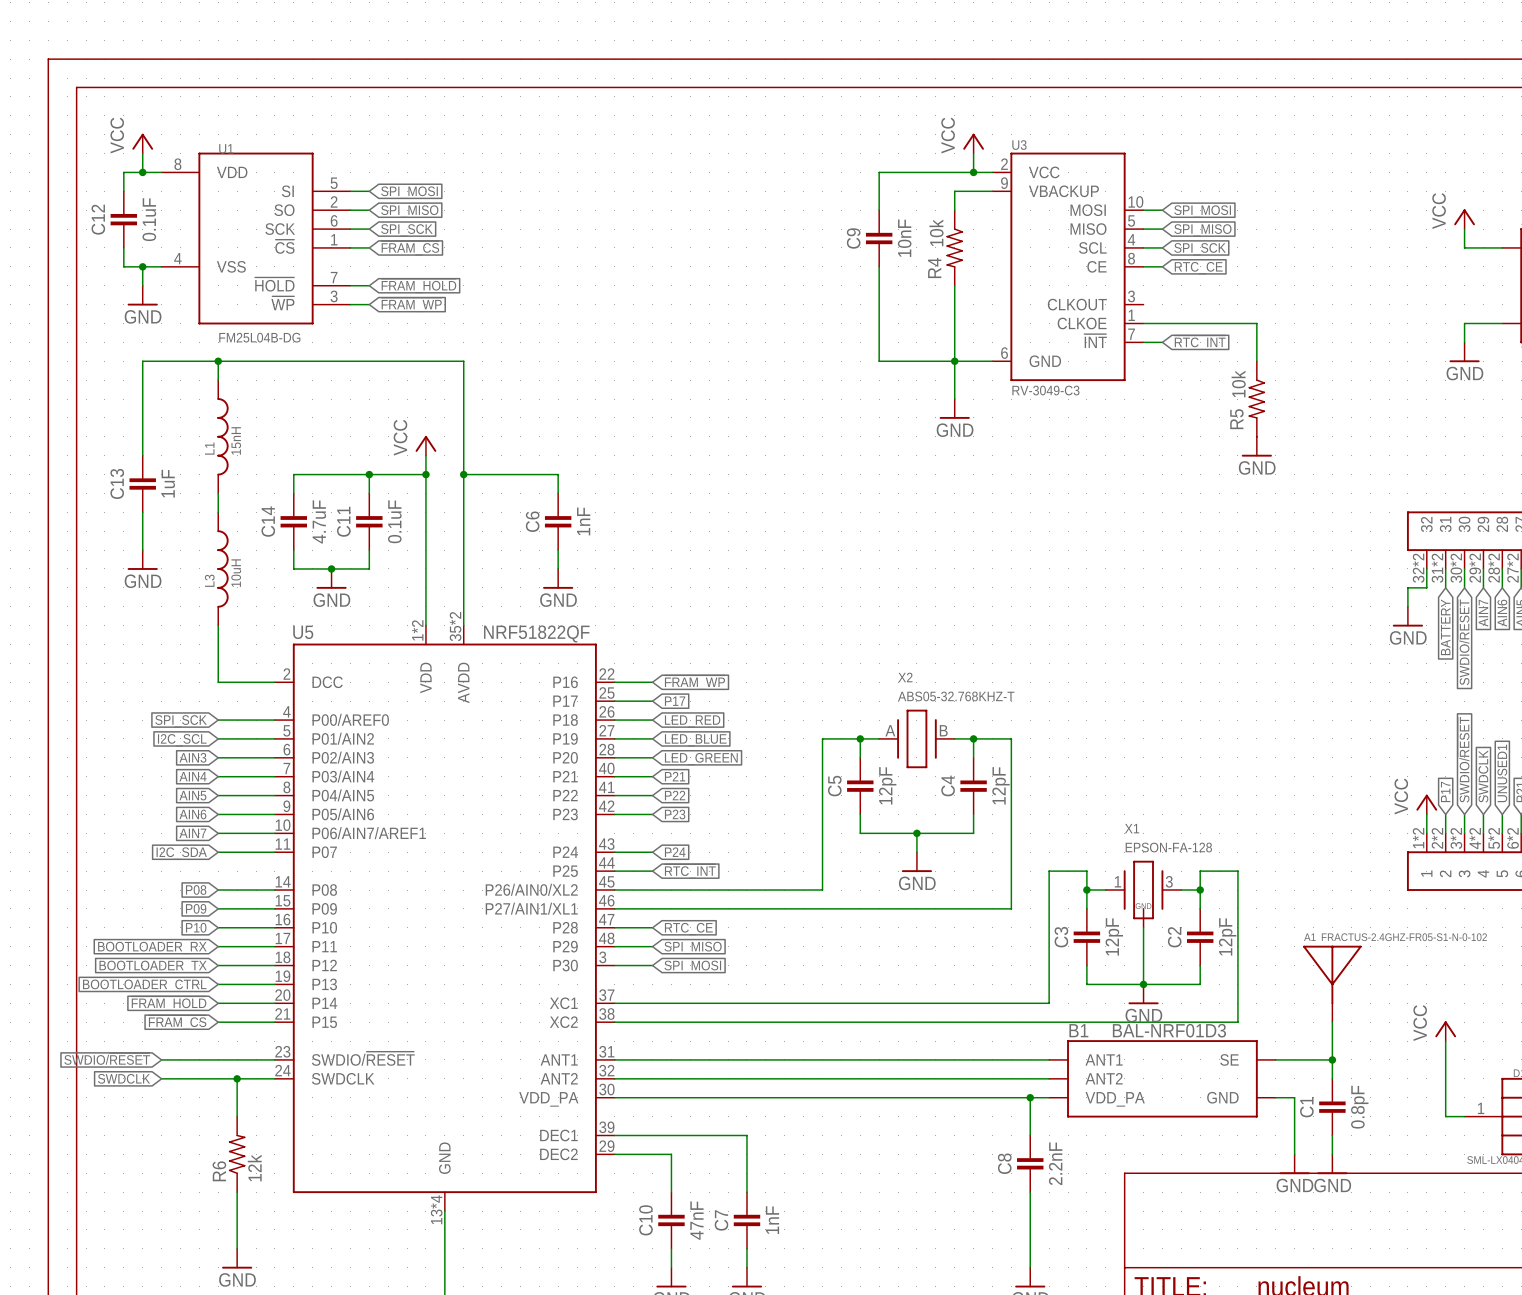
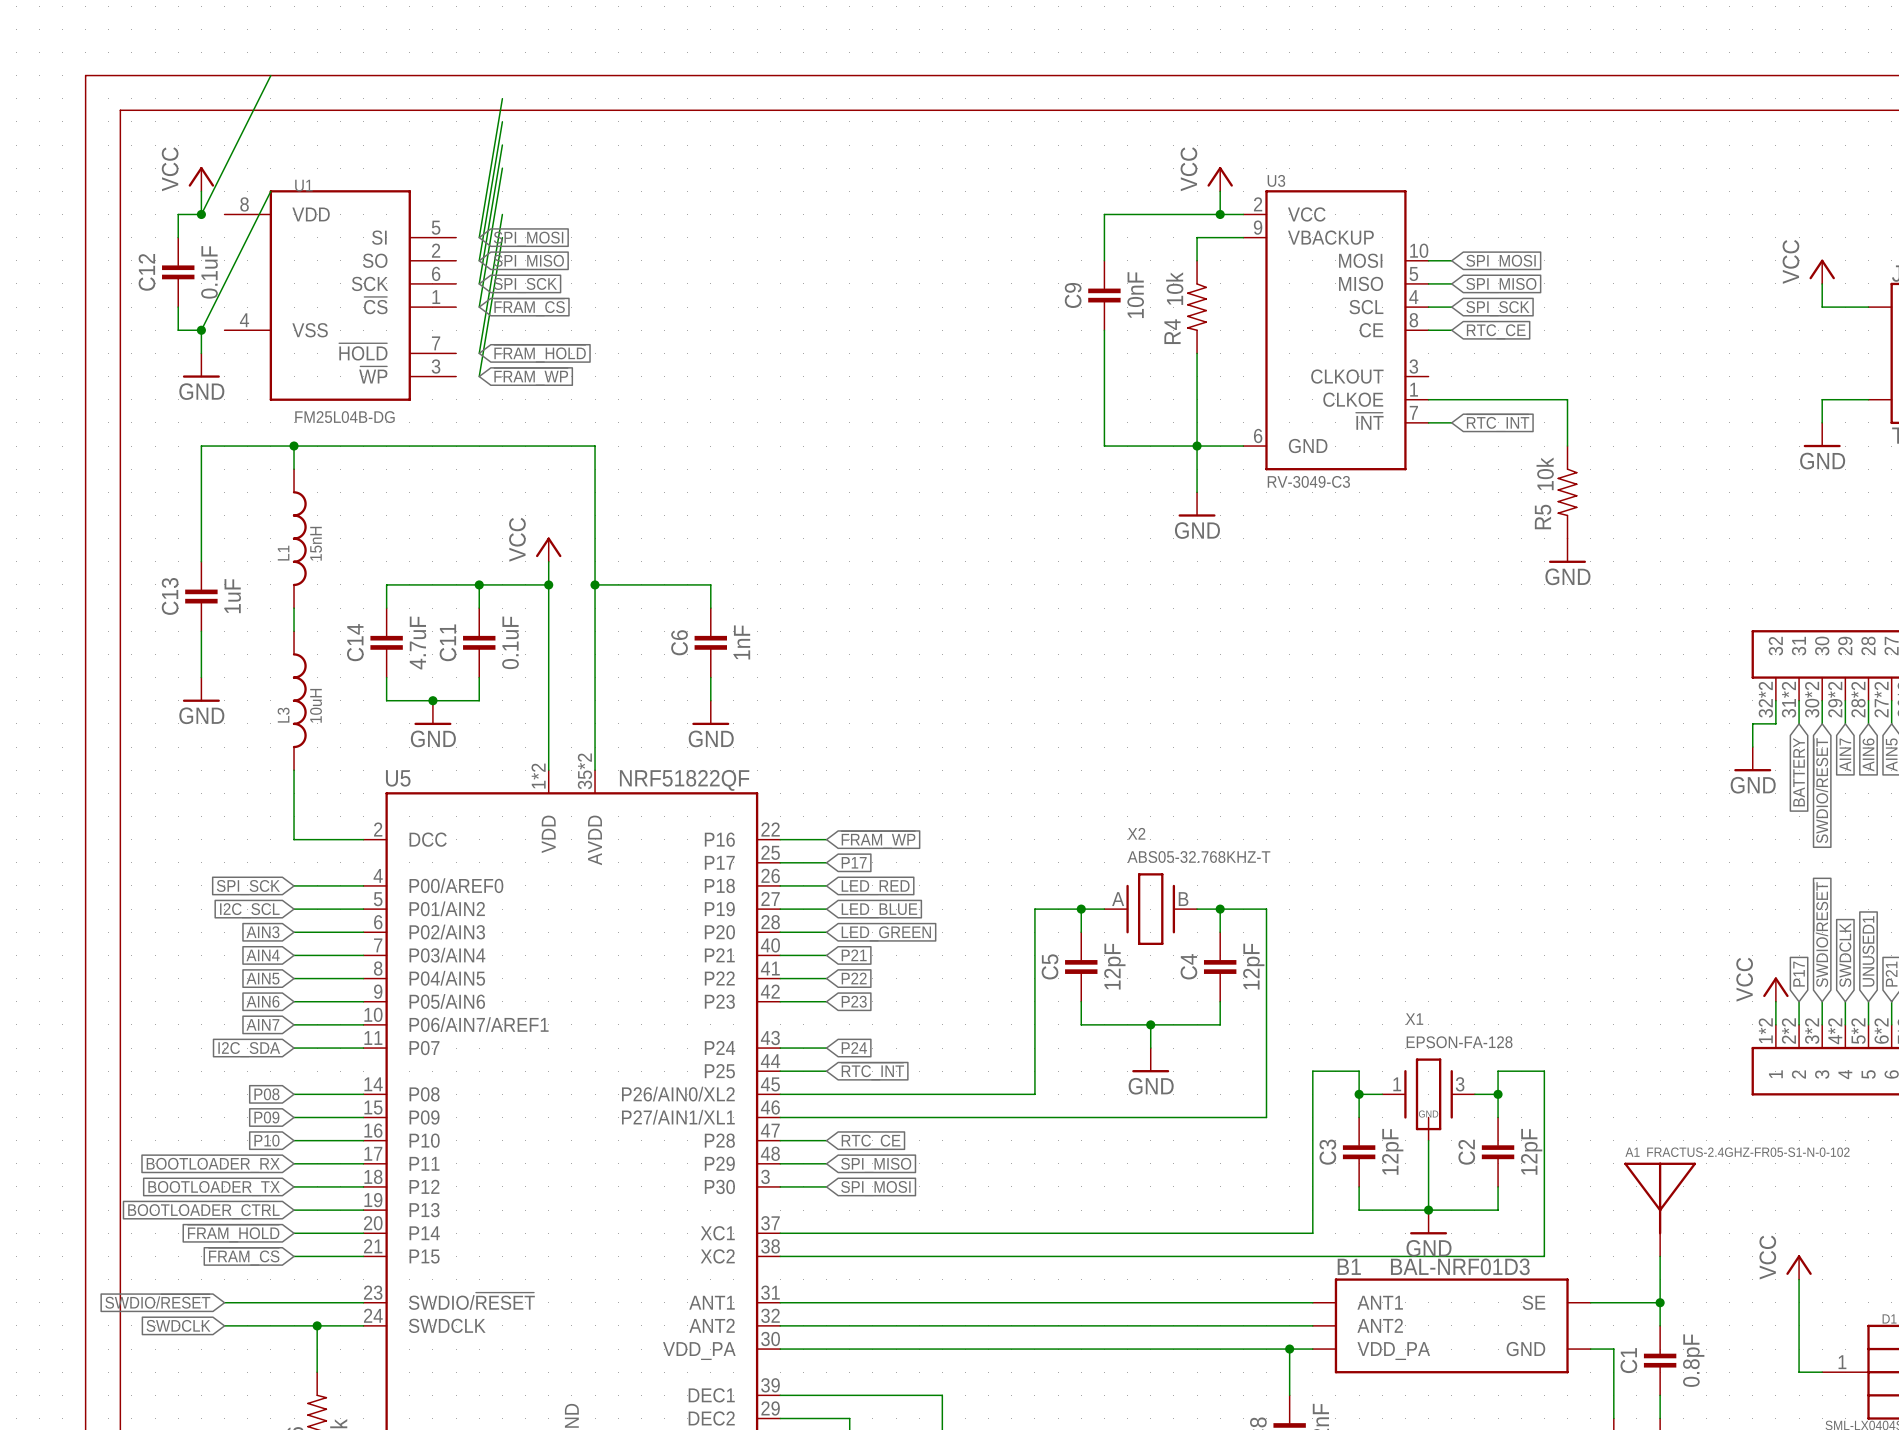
wire: (142, 172) (161, 172) -> (201, 214) (270, 75)
wire: (350, 191) (369, 191) -> (502, 98) (479, 237)
wire: (350, 210) (369, 210) -> (502, 121) (479, 260)
wire: (350, 229) (369, 229) -> (502, 145) (479, 283)
wire: (350, 247) (369, 247) -> (502, 168) (479, 307)
wire: (142, 266) (161, 266) -> (201, 330) (270, 191)
wire: (350, 285) (369, 285) -> (502, 214) (479, 353)
wire: (350, 304) (369, 304) -> (502, 237) (479, 376)

